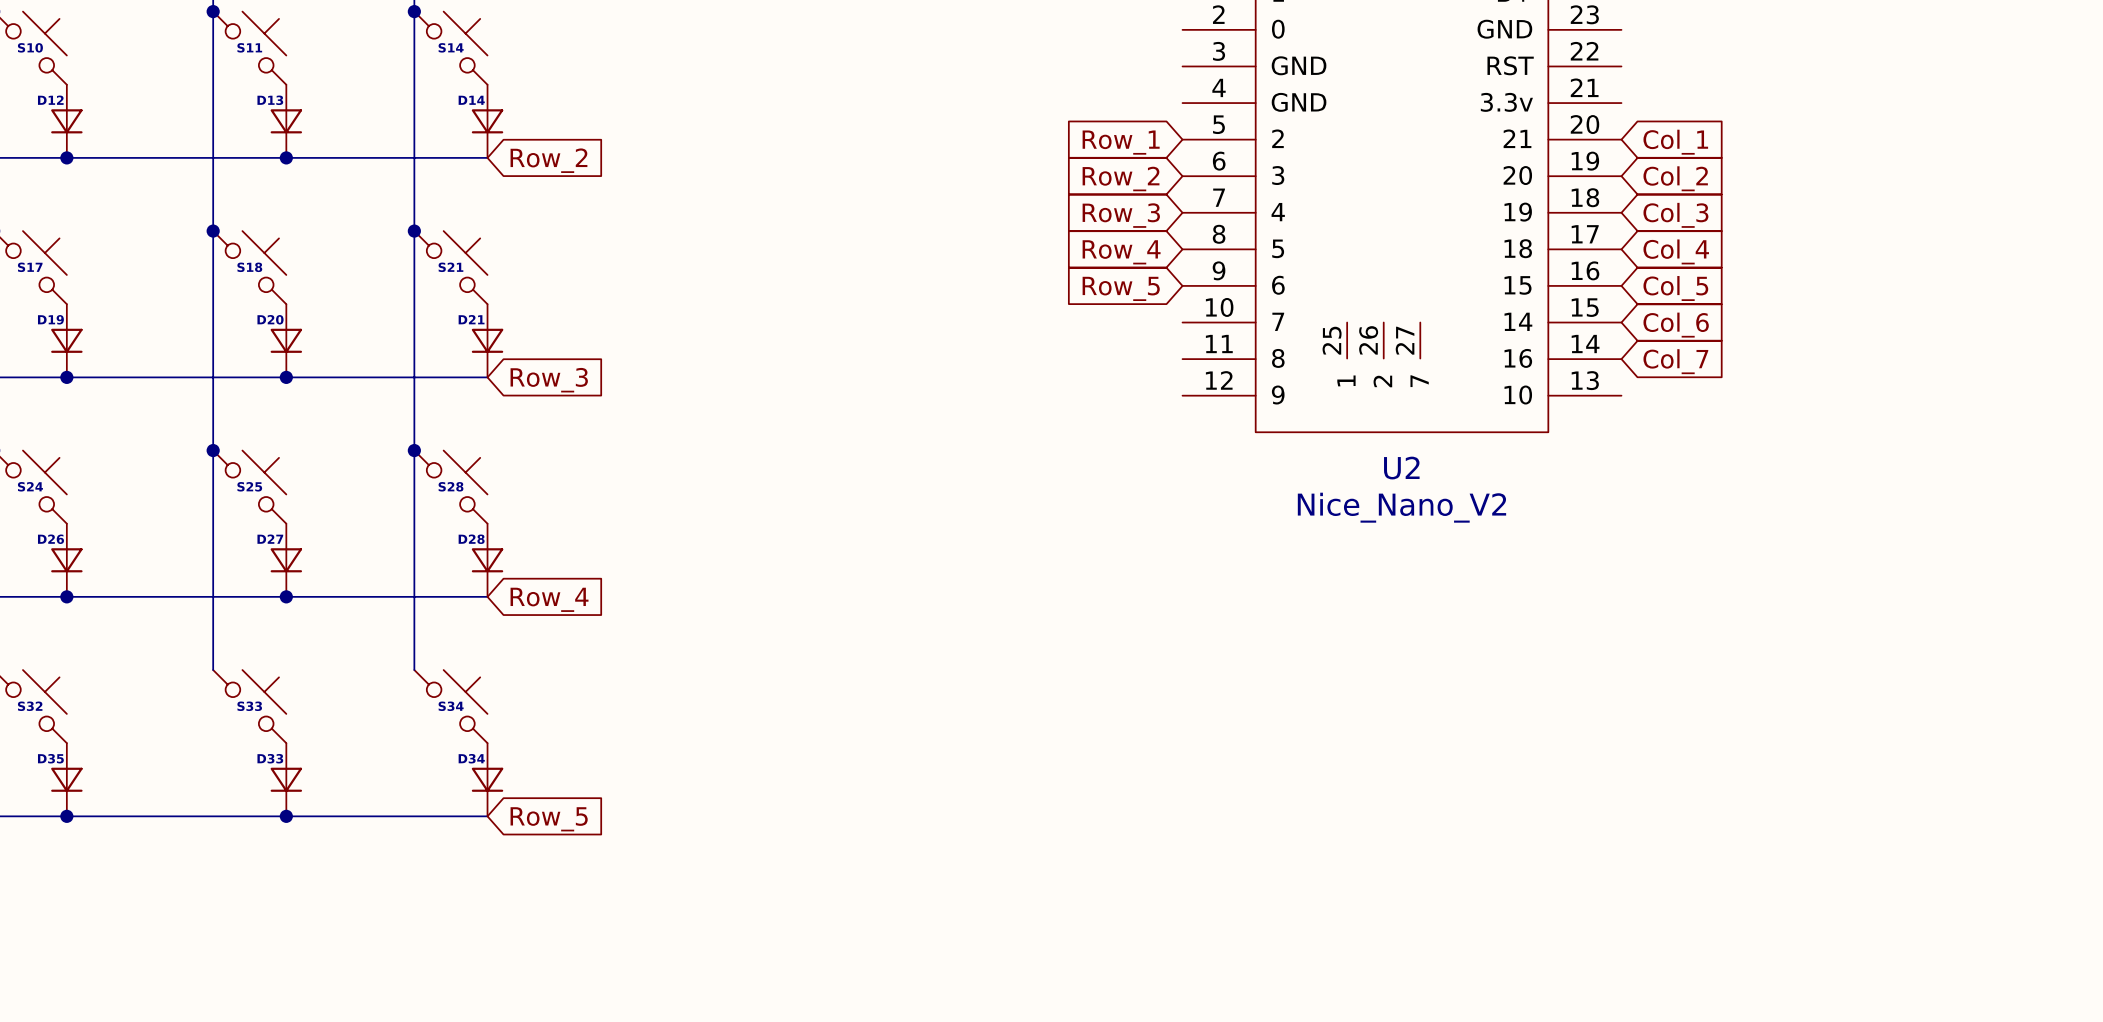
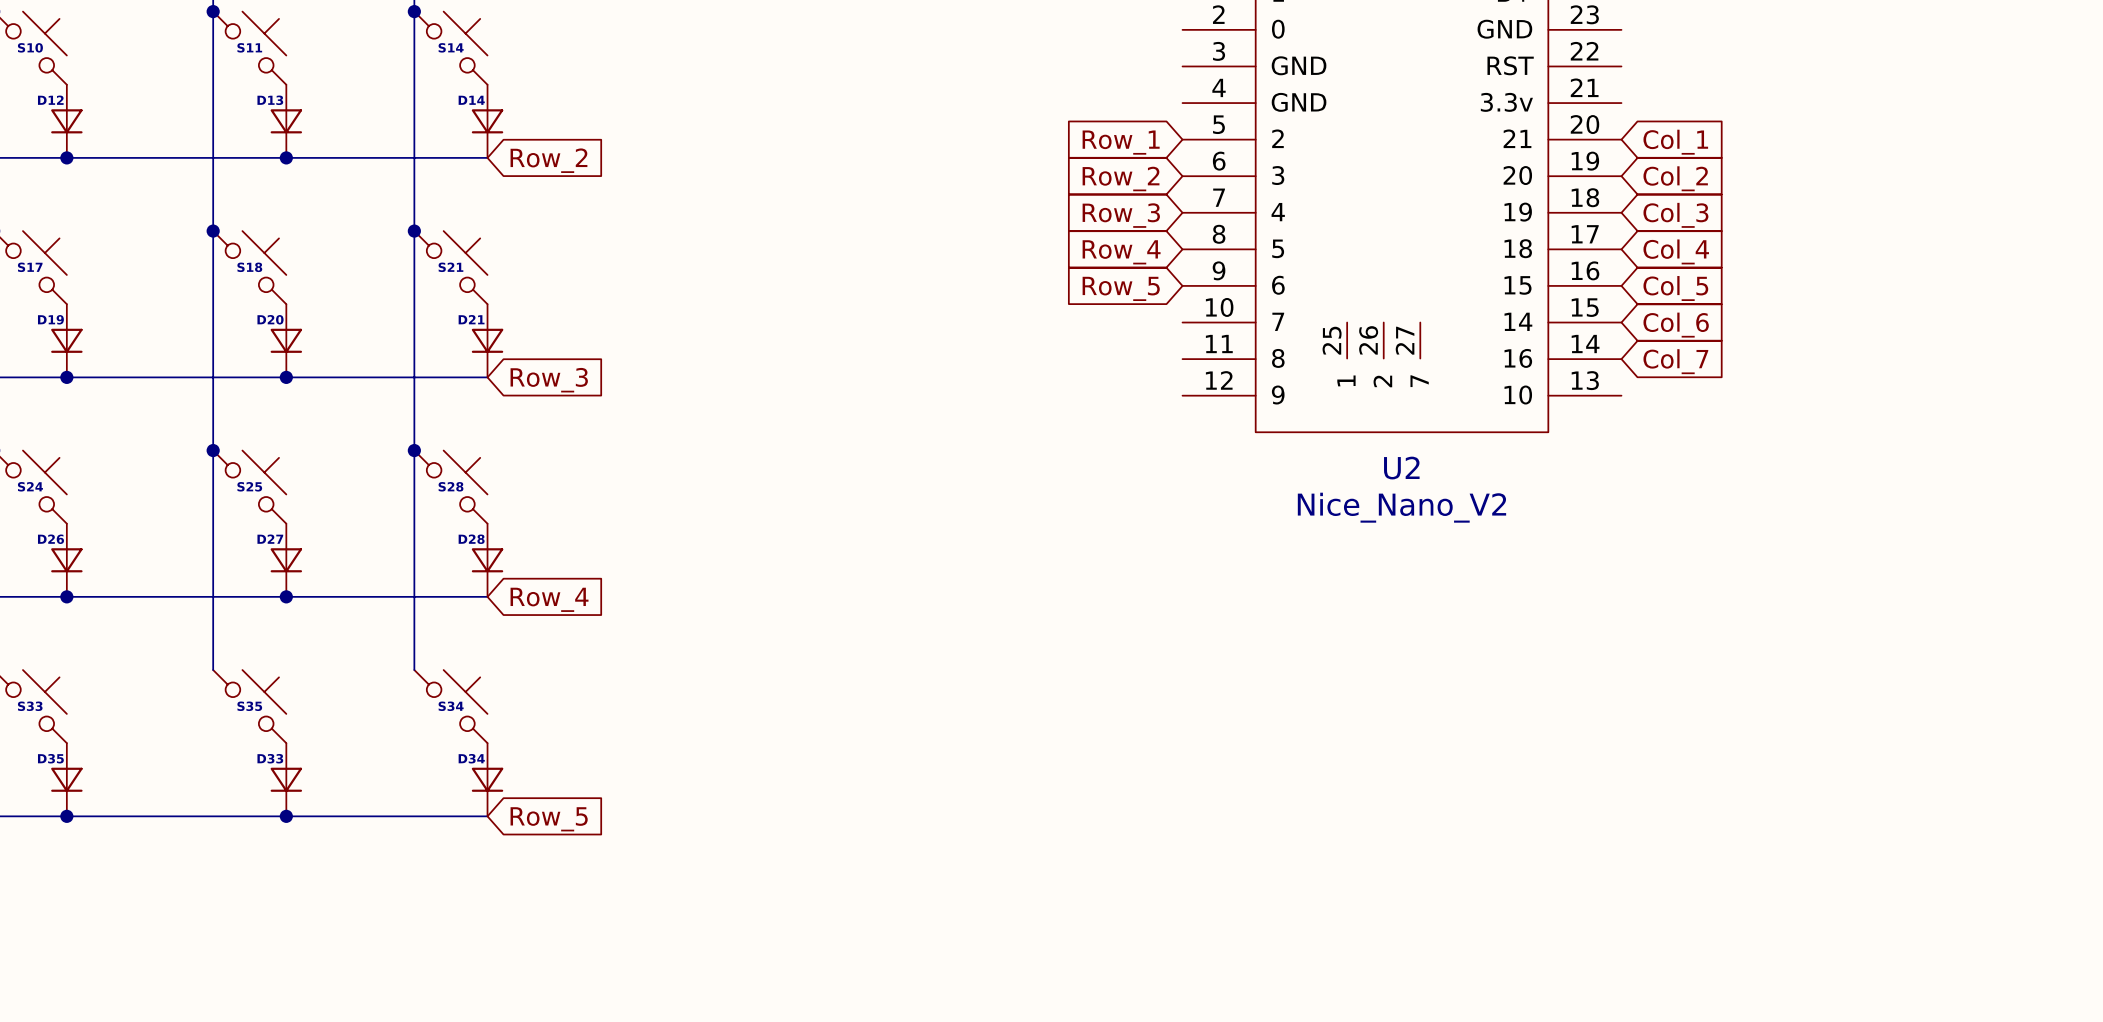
S32 name: S32 (30, 706) -> S33 (30, 706)
S33 name: S33 (249, 706) -> S35 (249, 706)

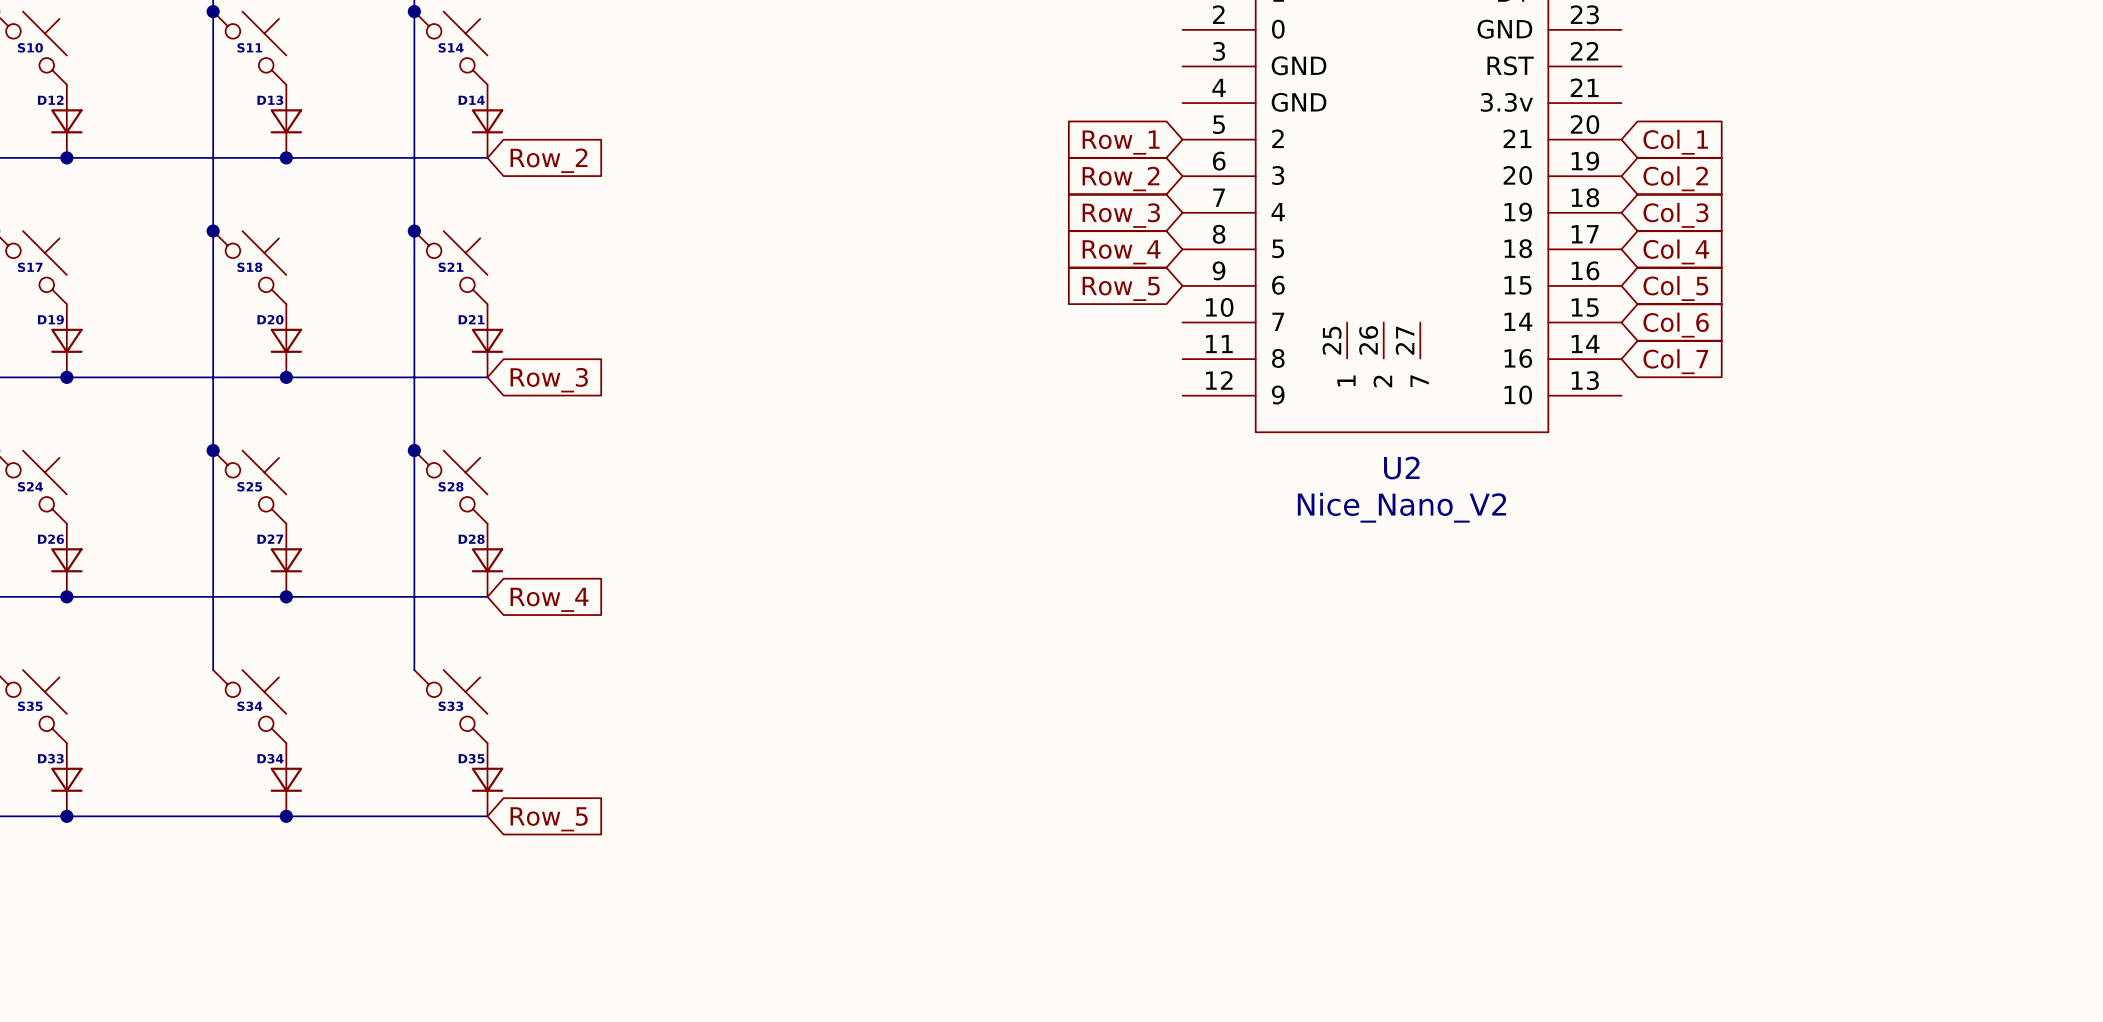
S33 name: S33 (30, 706) -> S35 (30, 706)
S35 name: S35 (249, 706) -> S34 (249, 706)
S34 name: S34 (451, 706) -> S33 (450, 706)
D35 name: D35 (50, 758) -> D33 (50, 758)
D33 name: D33 (270, 758) -> D34 (270, 758)
D34 name: D34 (471, 758) -> D35 (471, 758)

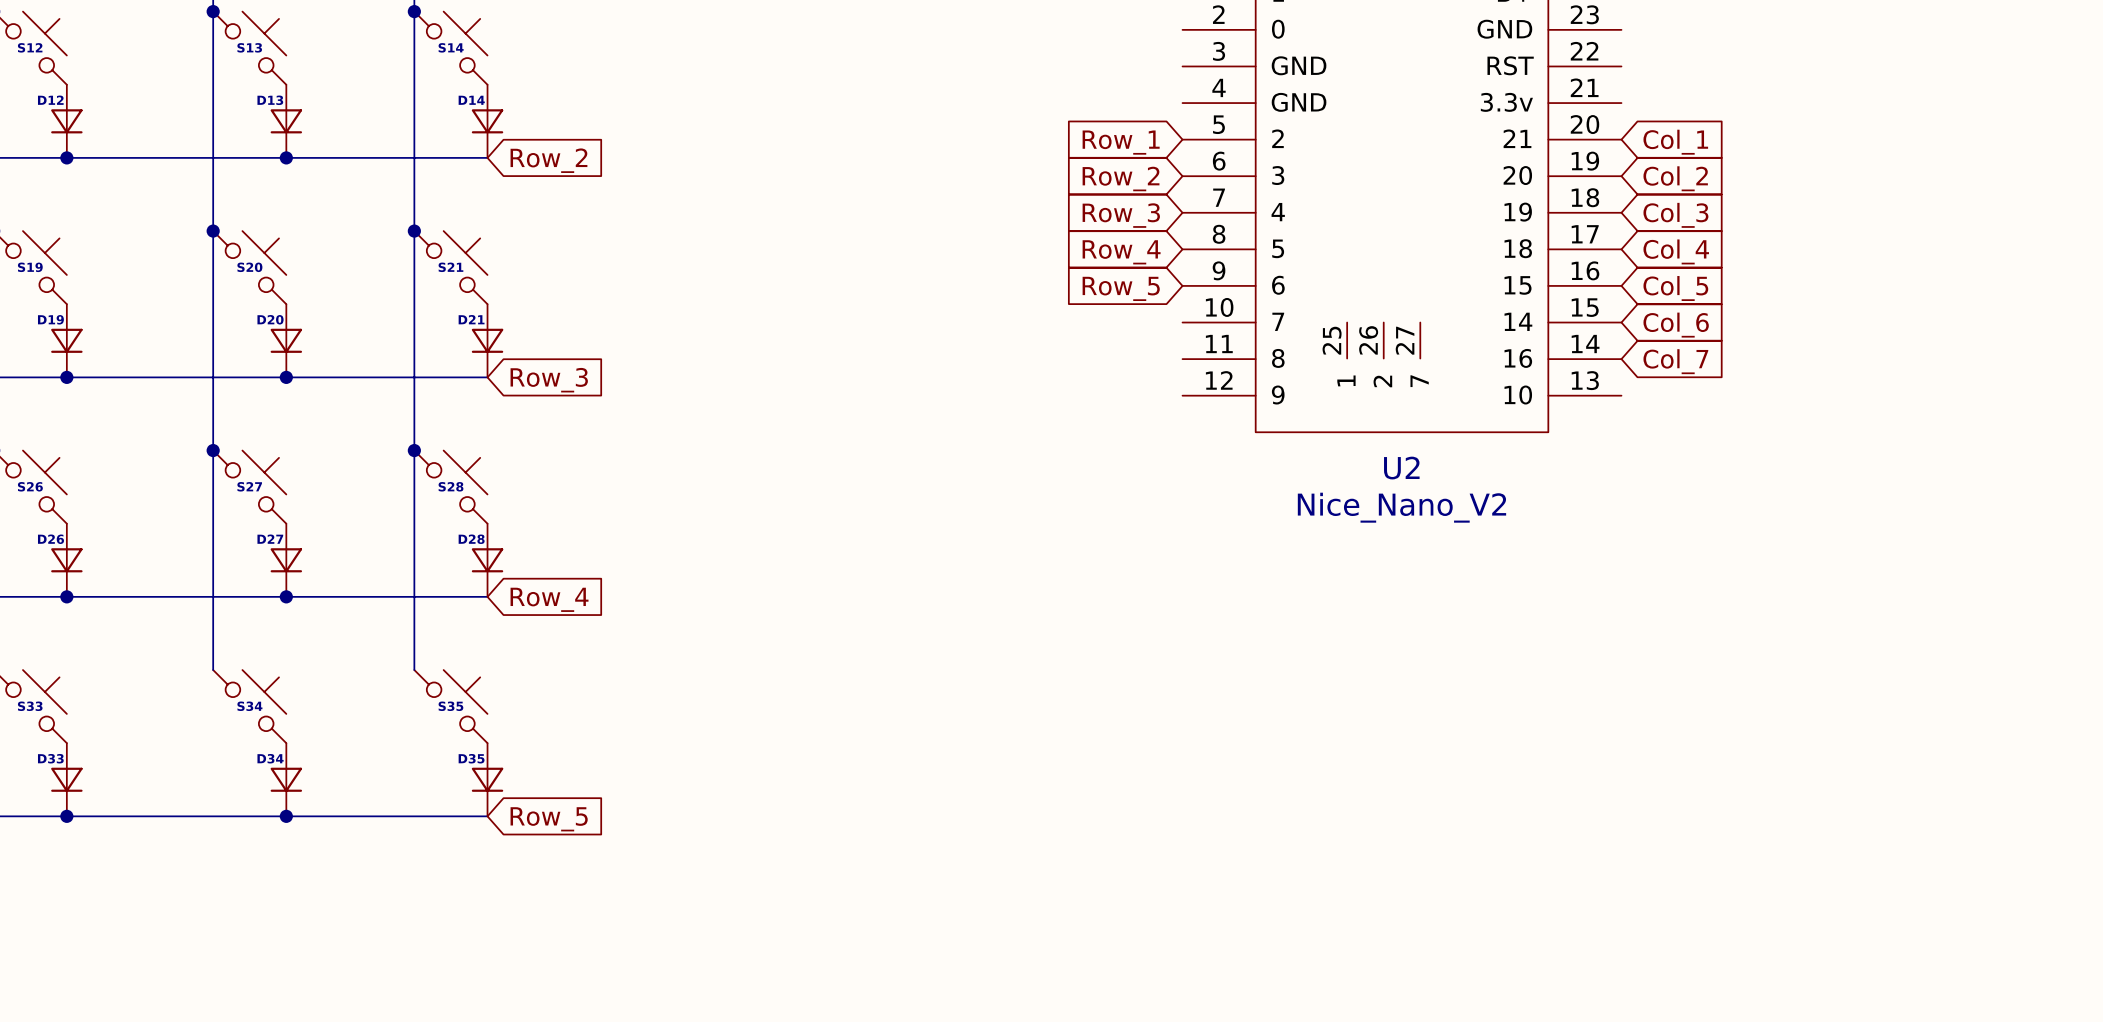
S10 name: S10 (30, 47) -> S12 (30, 47)
S11 name: S11 (249, 47) -> S13 (249, 47)
S17 name: S17 (30, 267) -> S19 (30, 267)
S18 name: S18 (249, 267) -> S20 (249, 267)
S24 name: S24 (30, 486) -> S26 (30, 486)
S25 name: S25 (249, 486) -> S27 (249, 486)
S35 name: S35 (30, 706) -> S33 (30, 706)
S33 name: S33 (450, 706) -> S35 (450, 706)

